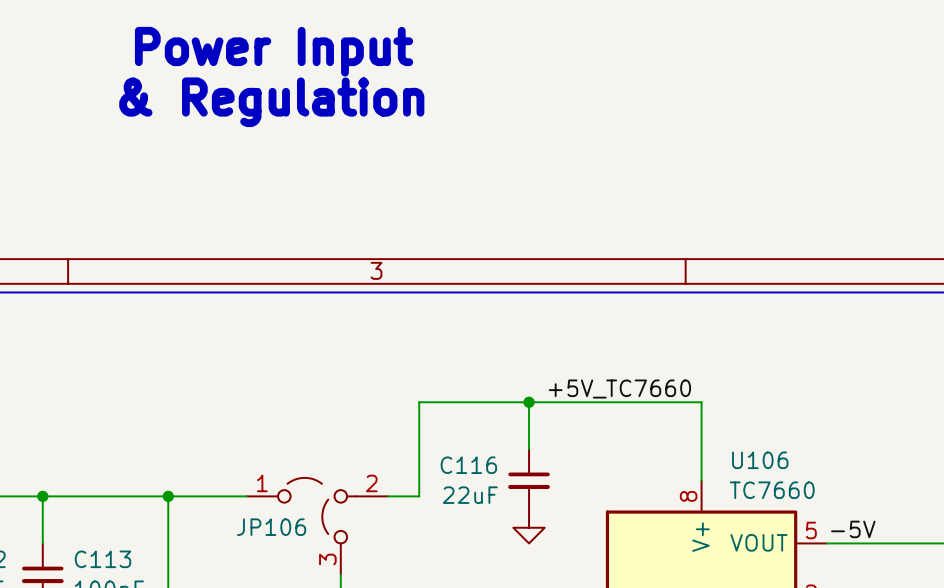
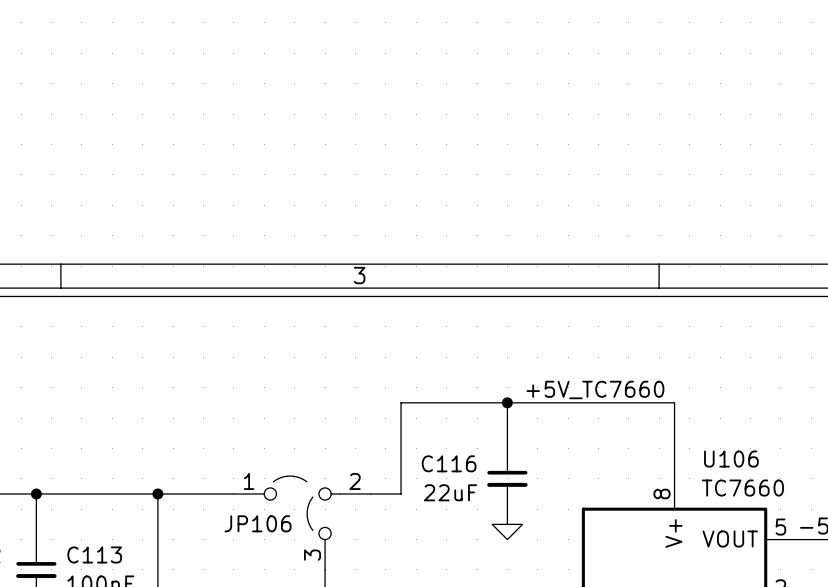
text: Power Input (274, 51) -> none
text: & Regulation (271, 102) -> none

